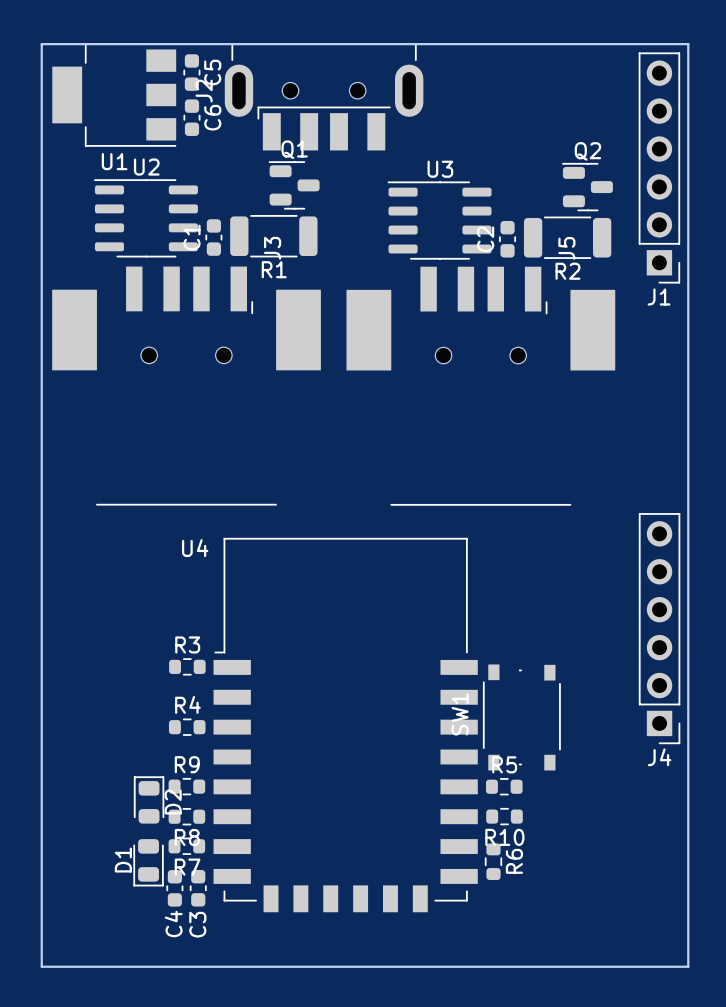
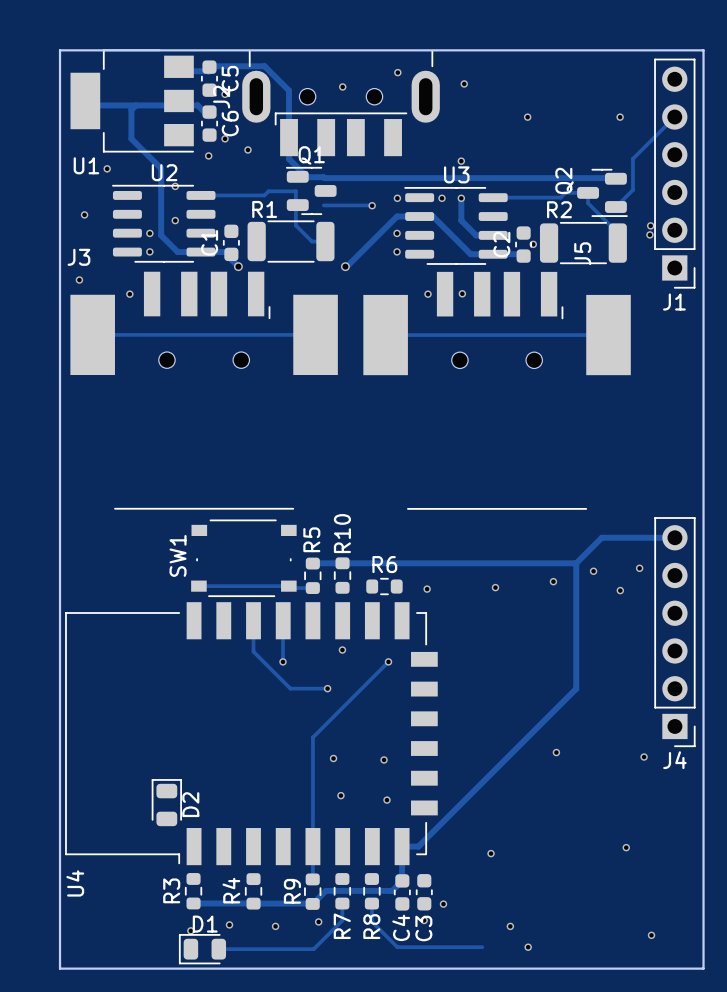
track: none -> (178, 71) (208, 71) (214, 66) (264, 66) (289, 90) (289, 159) (307, 177) (615, 178)
via: none -> (397, 72)
via: none -> (464, 83)
via: none -> (342, 86)
via: none -> (225, 94)
track: none -> (84, 105) (197, 105) (208, 116)
track: none -> (135, 105) (131, 109) (131, 138) (161, 168) (161, 235) (177, 252) (229, 252) (231, 254) (231, 259) (238, 266)
via: none -> (527, 117)
via: none -> (620, 117)
track: none -> (674, 117) (632, 158) (632, 189) (615, 207)
via: none -> (225, 138)
via: none -> (247, 149)
via: none -> (208, 155)
Q2 name position: Q2 (587, 151) -> Q2 (564, 180)
via: none -> (461, 161)
U1 name position: U1 (114, 161) -> U1 (86, 165)
via: none -> (107, 168)
via: none -> (175, 186)
Q2 rotation: 0° (587, 187) -> 180° (602, 192)
track: none -> (200, 195) (264, 195) (268, 191) (295, 191) (295, 225) (311, 241) (325, 241)
via: none -> (397, 198)
via: none -> (441, 198)
track: none -> (461, 198) (461, 220) (476, 235) (493, 235)
via: none -> (461, 198)
track: none -> (493, 197) (560, 197) (565, 192) (588, 192) (588, 203) (617, 232) (617, 243)
track: none -> (323, 205) (372, 205)
via: none -> (372, 205)
via: none -> (84, 214)
via: none -> (175, 220)
via: none -> (650, 225)
via: none -> (149, 233)
via: none -> (397, 233)
via: none -> (649, 234)
via: none -> (533, 244)
via: none -> (149, 251)
via: none -> (397, 251)
J3 name rotation: 0° (272, 248) -> 90° clockwise (78, 257)
J3 name position: J3 (272, 248) -> J3 (78, 257)
track: none -> (523, 256) (521, 254) (470, 254) (433, 216) (397, 216) (345, 266)
via: none -> (238, 266)
via: none -> (345, 266)
R1 name position: R1 (274, 269) -> R1 (264, 209)
R2 name position: R2 (567, 271) -> R2 (559, 209)
via: none -> (79, 280)
via: none -> (462, 293)
via: none -> (129, 294)
via: none -> (428, 294)
track: none -> (92, 334) (315, 334)
track: none -> (385, 335) (608, 335)
track: none -> (674, 537) (601, 537) (576, 563)
track: none -> (576, 563) (312, 563)
track: none -> (576, 563) (576, 688) (418, 846) (402, 846) (402, 880) (392, 890) (325, 890) (312, 903)
via: none -> (639, 568)
via: none -> (593, 571)
via: none -> (553, 581)
track: none -> (198, 586) (288, 586) (290, 588) (312, 588)
via: none -> (495, 587)
via: none -> (427, 589)
via: none -> (620, 590)
track: none -> (253, 620) (253, 651) (290, 688) (327, 688)
track: none -> (283, 620) (283, 661)
R3 name position: R3 (187, 644) -> R3 (171, 890)
via: none -> (342, 650)
via: none -> (283, 661)
track: none -> (388, 661) (312, 737) (312, 879)
via: none -> (388, 661)
R3 rotation: 0° (187, 666) -> 90° clockwise (193, 891)
R3 position: (187, 666) -> (193, 891)
via: none -> (327, 688)
R4 name position: R4 (187, 704) -> R4 (231, 890)
SW1 rotation: 0° (521, 717) -> 90° counterclockwise (243, 558)
SW1 position: (521, 717) -> (243, 558)
U4 rotation: 0° (345, 725) -> 90° counterclockwise (251, 733)
R4 rotation: 0° (187, 727) -> 90° clockwise (253, 891)
R4 position: (187, 727) -> (253, 891)
via: none -> (556, 752)
via: none -> (644, 757)
via: none -> (333, 758)
via: none -> (384, 759)
R9 rotation: 0° (186, 786) -> 90° clockwise (312, 891)
R9 position: (186, 786) -> (312, 891)
R5 rotation: 0° (504, 786) -> 90° clockwise (312, 575)
R5 position: (504, 786) -> (312, 575)
via: none -> (340, 795)
via: none -> (387, 800)
R8 rotation: 0° (186, 816) -> 90° clockwise (371, 891)
R8 position: (186, 816) -> (371, 891)
R10 rotation: 0° (504, 816) -> 90° clockwise (342, 575)
R10 position: (504, 816) -> (342, 575)
R10 name position: R10 (504, 837) -> R10 (342, 533)
via: none -> (626, 847)
R7 rotation: 0° (186, 846) -> 90° clockwise (342, 891)
R7 position: (186, 846) -> (342, 891)
via: none -> (491, 853)
R6 rotation: 0° (493, 861) -> 90° clockwise (384, 586)
R6 position: (493, 861) -> (384, 586)
R6 name position: R6 (514, 861) -> R6 (384, 564)
D1 rotation: 0° (148, 862) -> 90° clockwise (202, 949)
D1 position: (148, 862) -> (202, 949)
C4 position: (174, 888) -> (402, 892)
C3 position: (198, 888) -> (424, 892)
track: none -> (193, 903) (253, 903)
track: none -> (253, 903) (312, 903)
track: none -> (342, 903) (342, 920) (313, 949) (218, 949)
track: none -> (371, 903) (371, 921) (397, 947) (482, 947)
via: none -> (443, 904)
via: none -> (424, 920)
via: none -> (318, 921)
via: none -> (229, 924)
via: none -> (275, 926)
via: none -> (510, 926)
via: none -> (190, 930)
via: none -> (651, 935)
via: none -> (528, 947)

